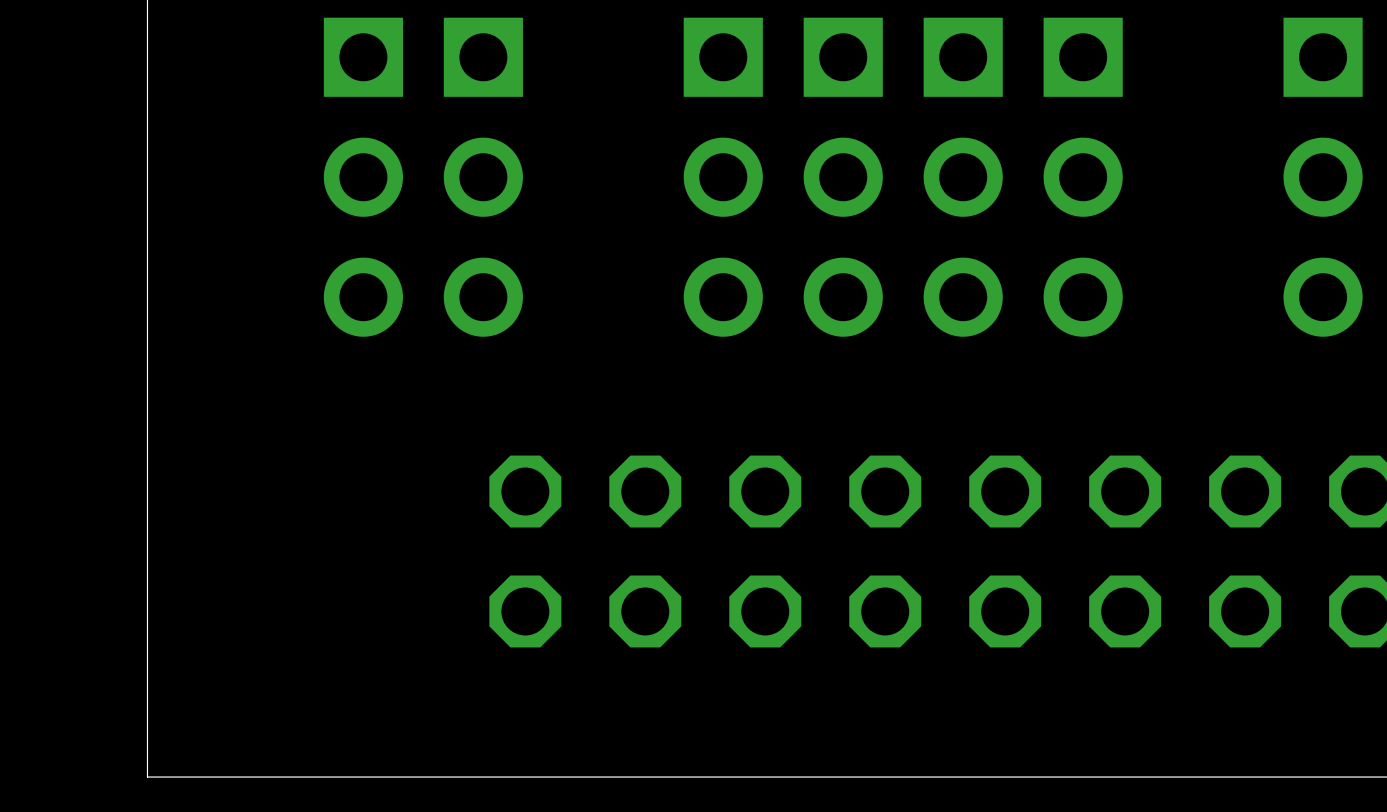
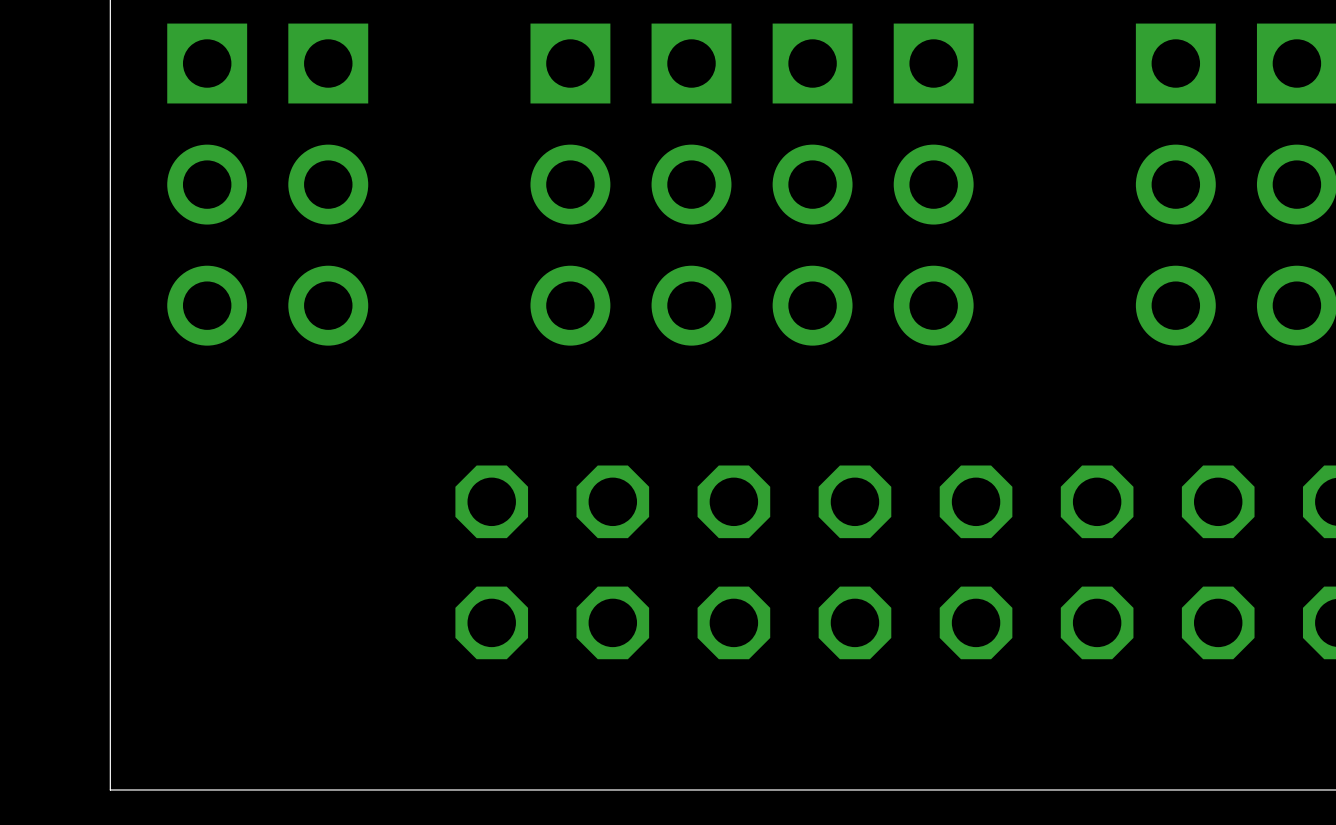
part: none -> (207, 184)
part: (483, 177) -> none
part: none -> (570, 184)
part position: (1083, 177) -> (1175, 184)

